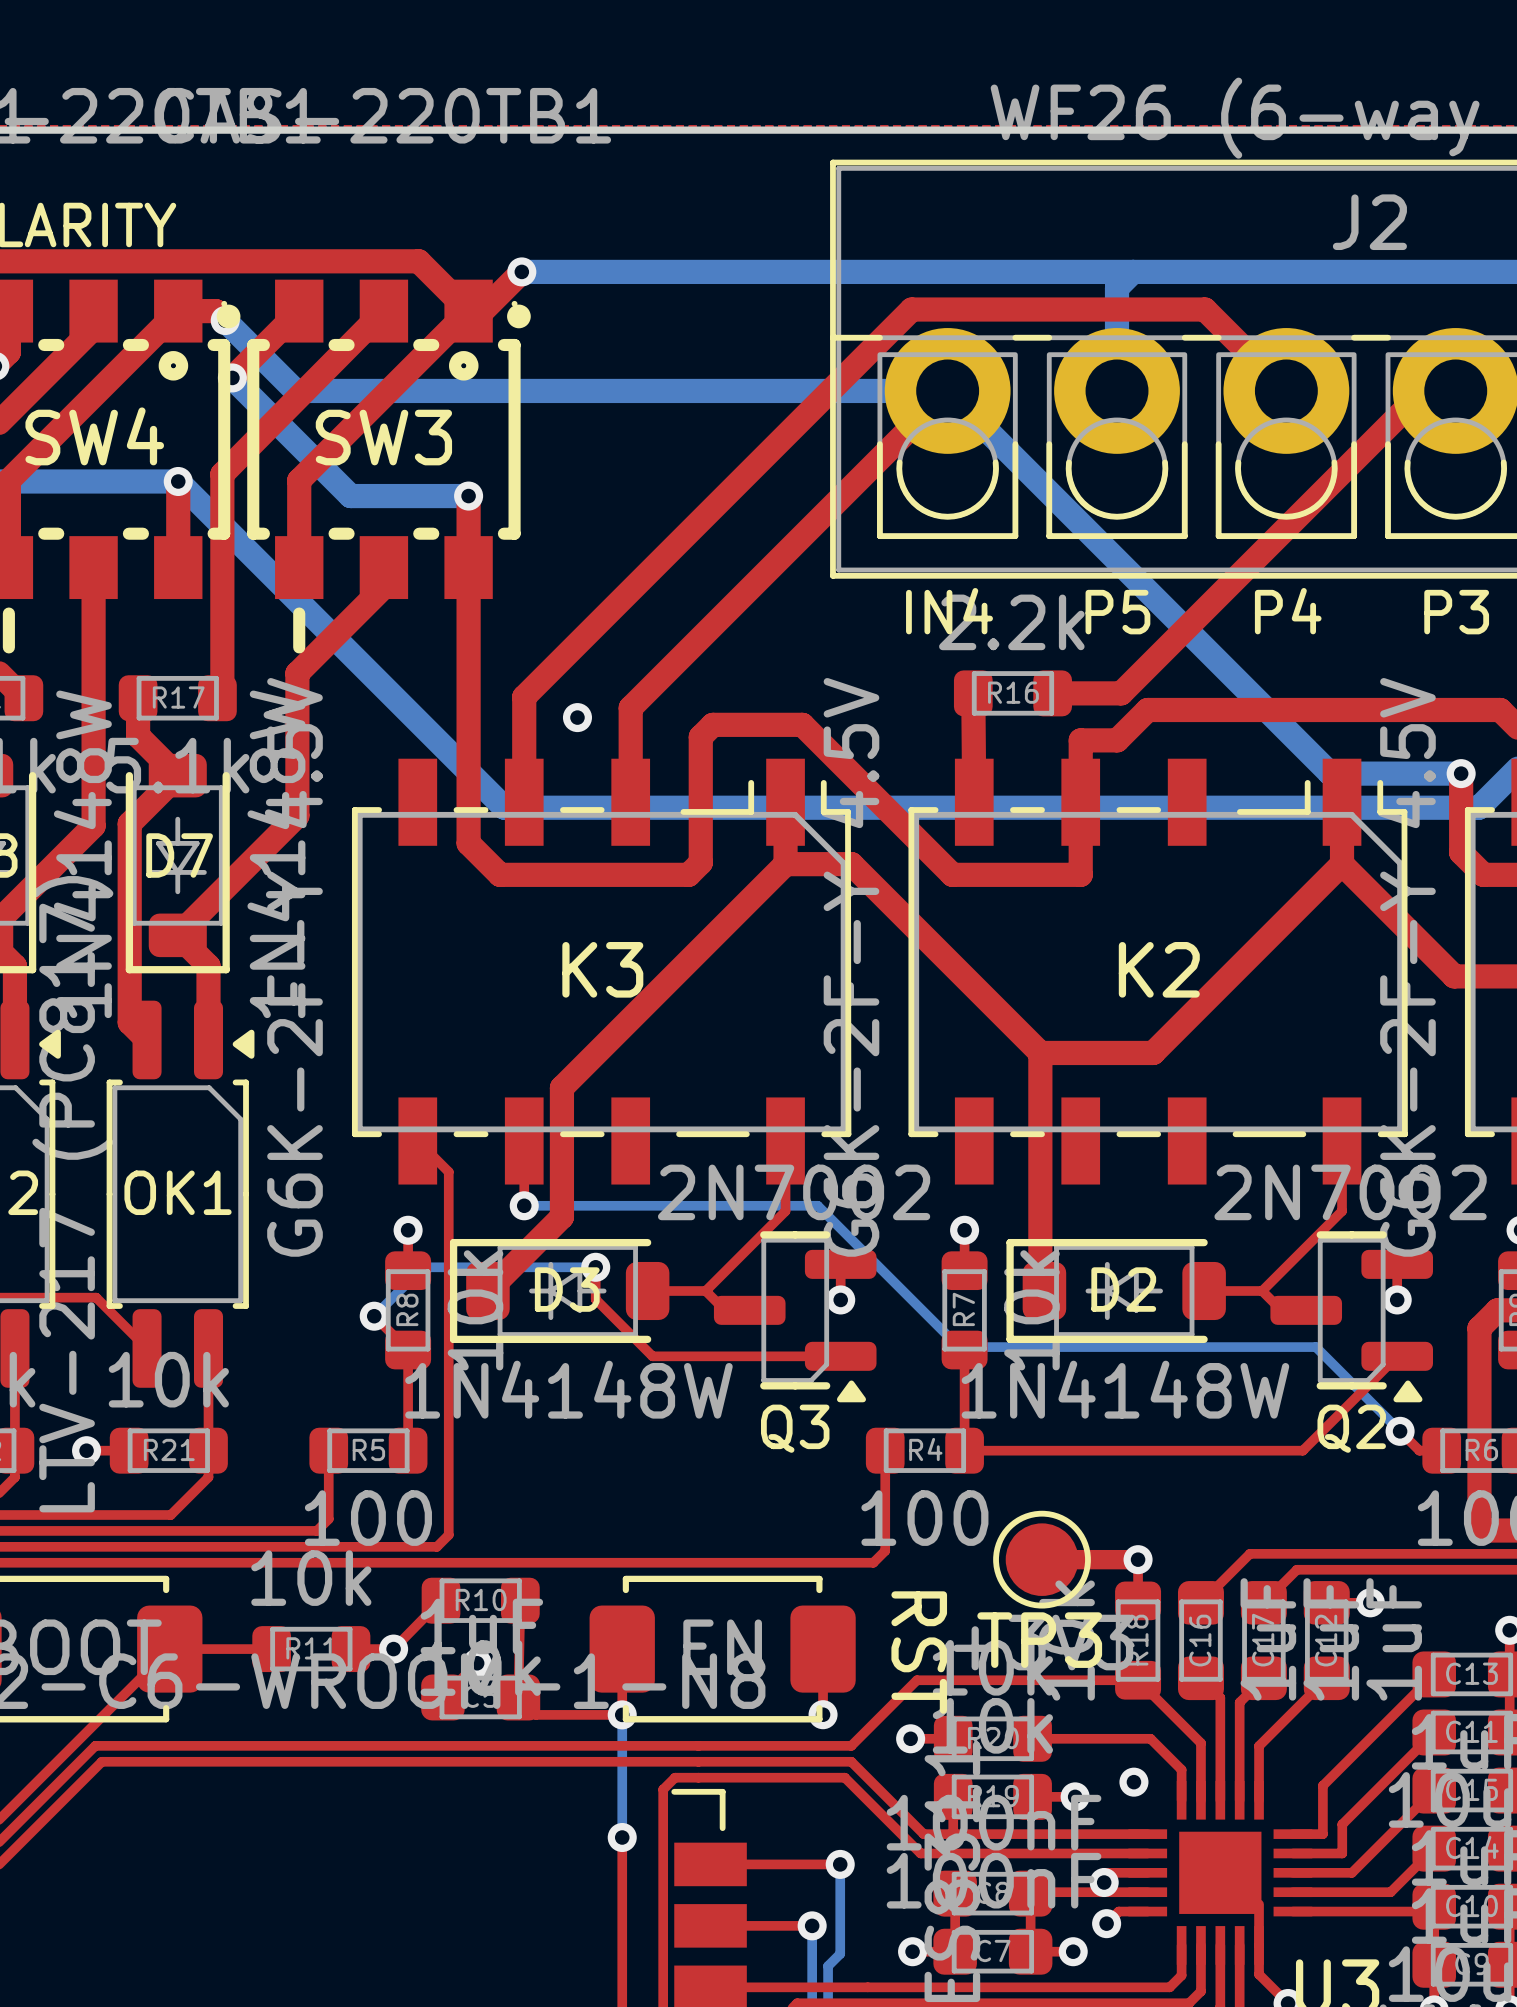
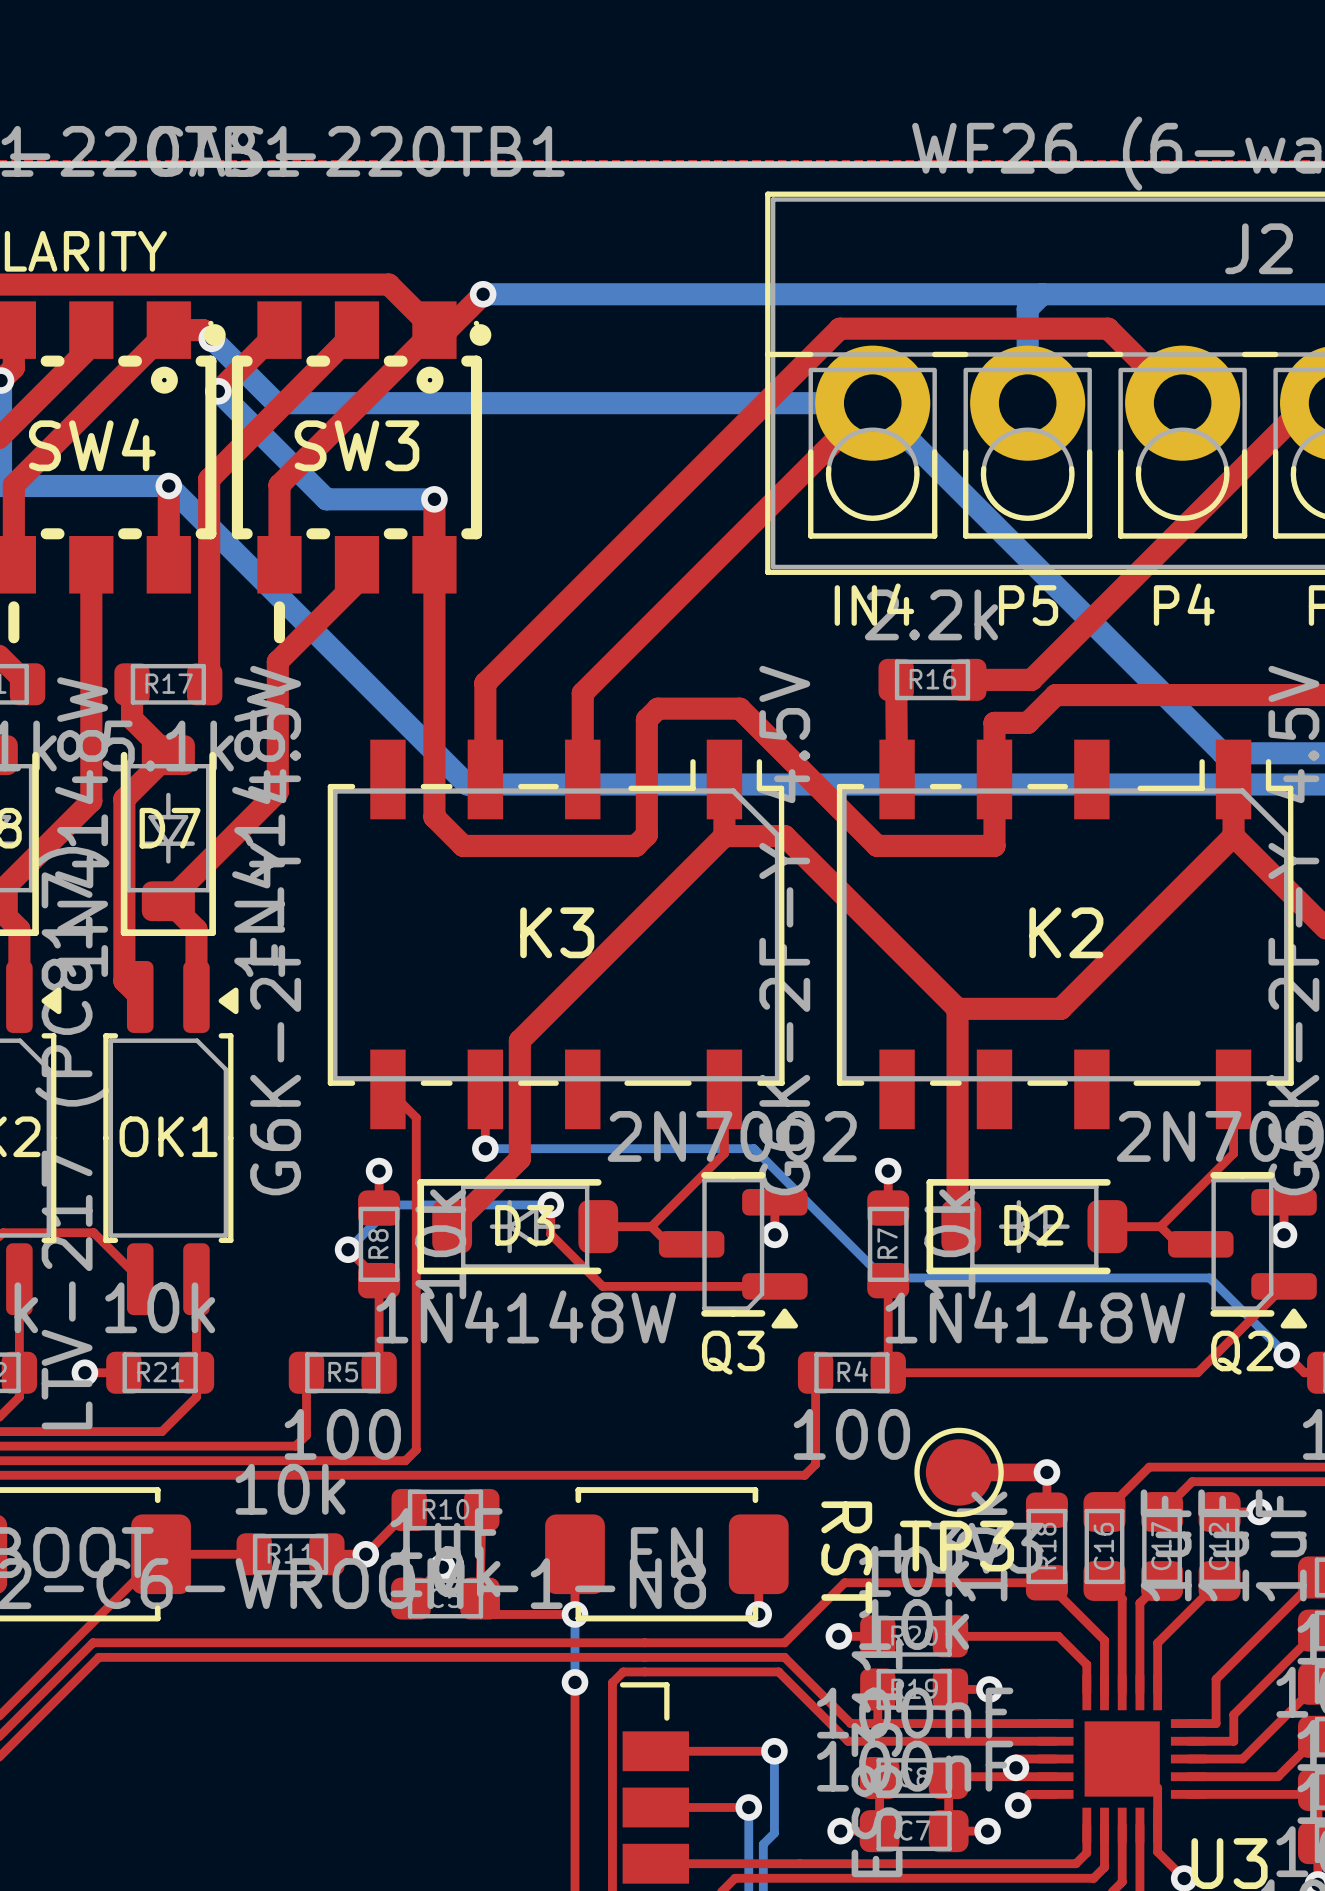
via: (577, 717) -> none
via: (1133, 1782) -> none
top track: none -> (575, 1682) (575, 1726)
bottom track: (622, 1789) (622, 1837) -> none
via position: (622, 1837) -> (575, 1682)

